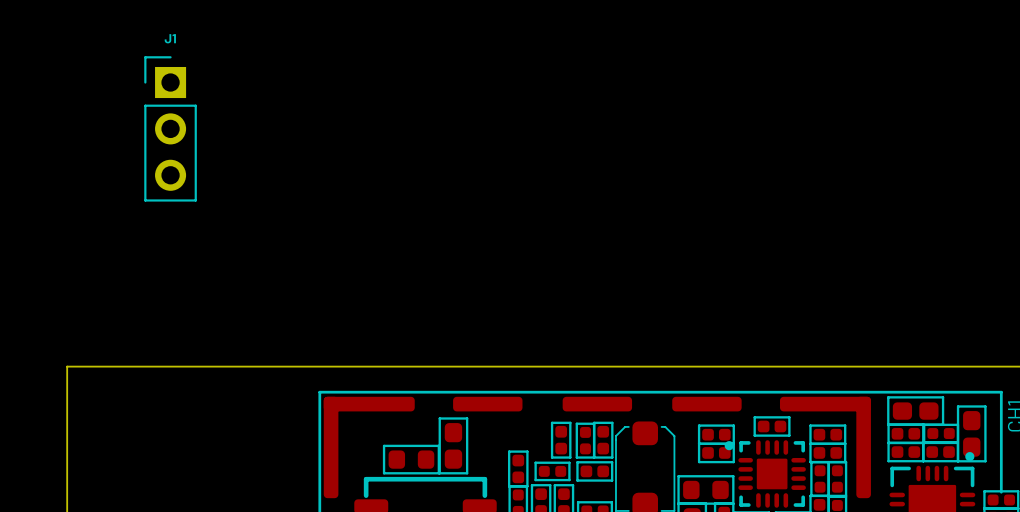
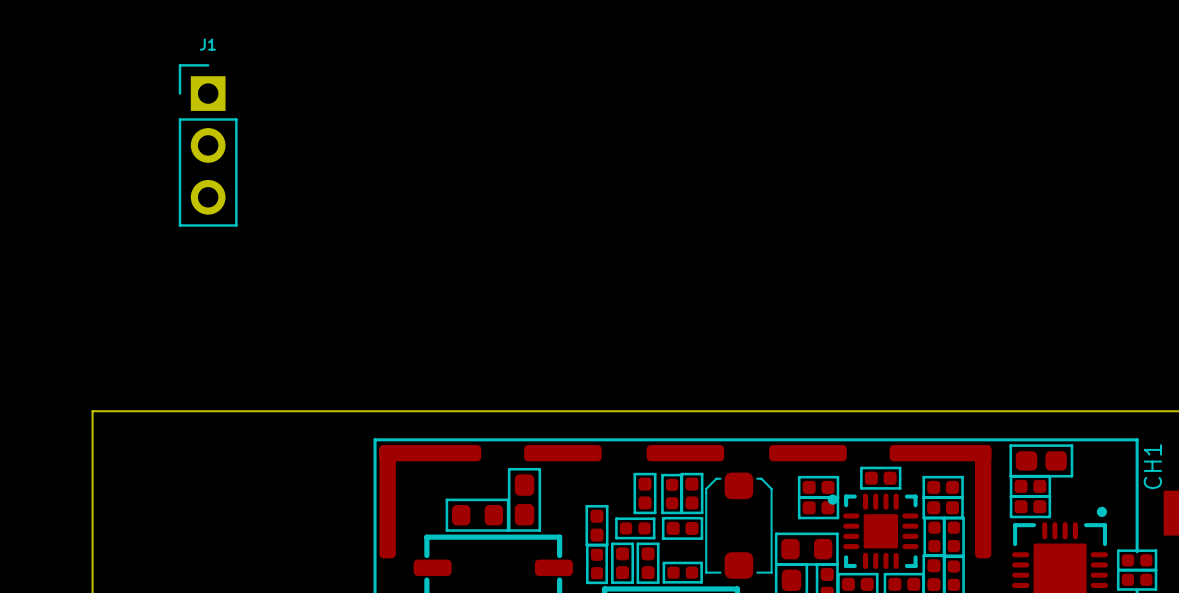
part: (941, 433) -> none
part: (971, 433) -> none
part: (940, 452) -> none

